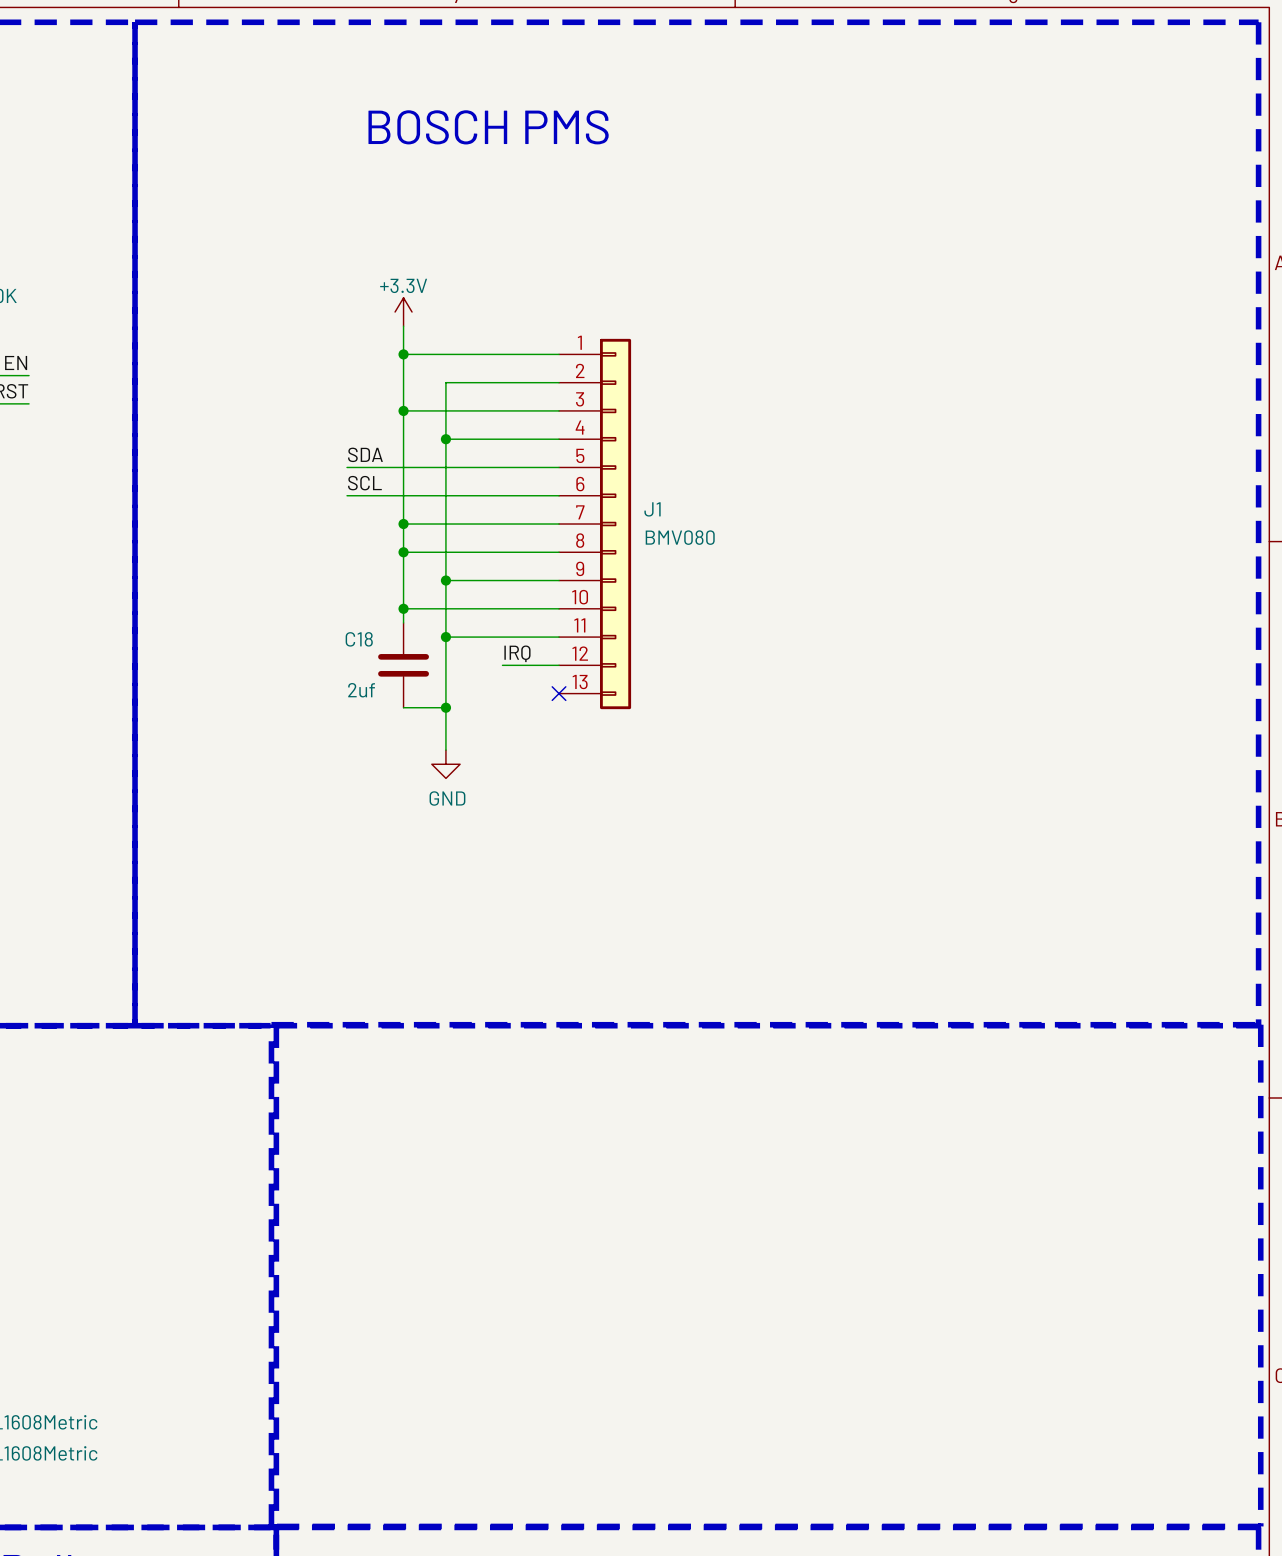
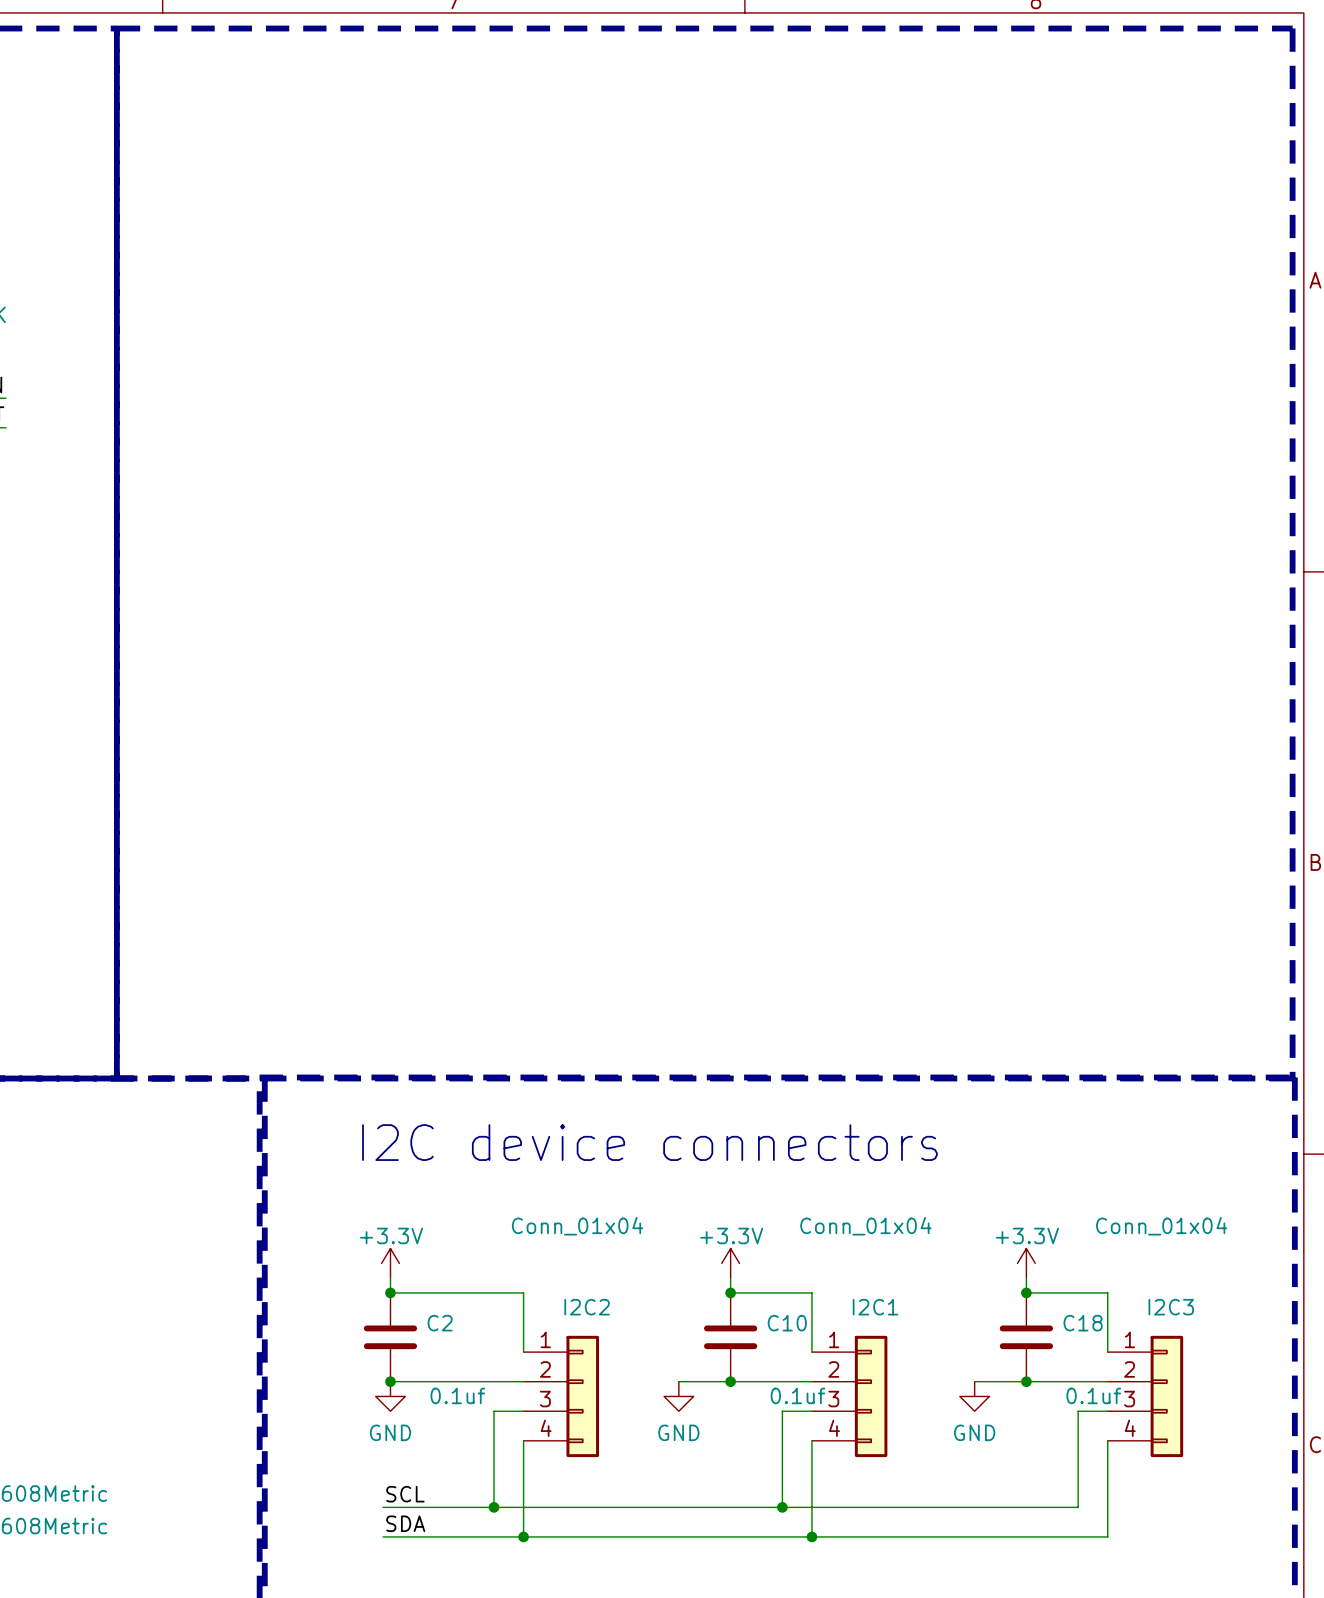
text: BOSCH PMS (488, 127) -> none
power symbol: +3.3V (403, 312) -> none
wire: (403, 326) (403, 622) -> none
wire: (403, 354) (559, 354) -> none
junction: (403, 354) -> none
wire: (559, 382) (445, 382) (445, 750) -> none
wire: (403, 410) (559, 410) -> none
junction: (403, 410) -> none
wire: (445, 439) (559, 439) -> none
junction: (445, 439) -> none
label: SDA (365, 454) -> none
wire: (347, 467) (559, 467) -> none
label: SCL (364, 483) -> none
wire: (347, 495) (559, 495) -> none
wire: (403, 524) (559, 524) -> none
junction: (403, 524) -> none
J1: BMV080 (595, 524) -> none
wire: (403, 552) (559, 552) -> none
junction: (403, 552) -> none
wire: (445, 580) (559, 580) -> none
junction: (445, 580) -> none
wire: (403, 608) (559, 608) -> none
junction: (403, 608) -> none
wire: (445, 637) (559, 637) -> none
junction: (445, 637) -> none
C18 name position: C18 (359, 639) -> C18 (1083, 1323)
label: IRQ (517, 653) -> none
C18 position: (403, 665) -> (1026, 1337)
wire: (502, 665) (559, 665) -> none
C18 value: 2uf (361, 690) -> 0.1uf (1093, 1395)
no-connect mark: (559, 693) -> none
wire: (403, 707) (445, 707) -> none
junction: (445, 707) -> none
power symbol: GND (445, 764) -> none
text: none -> I2C device connectors (649, 1142)
power symbol: none -> +3.3V (390, 1263)
power symbol: none -> +3.3V (730, 1263)
power symbol: none -> +3.3V (1026, 1263)
wire: none -> (390, 1278) (390, 1292) (523, 1292) (523, 1352)
wire: none -> (730, 1278) (730, 1292) (811, 1292) (811, 1352)
wire: none -> (1026, 1278) (1026, 1292) (1107, 1292) (1107, 1352)
junction: none -> (390, 1292)
junction: none -> (730, 1292)
junction: none -> (1026, 1292)
C2: none -> 0.1uf (390, 1337)
C10: none -> 0.1uf (730, 1337)
wire: none -> (390, 1381) (523, 1381)
junction: none -> (390, 1381)
wire: none -> (678, 1381) (811, 1381)
junction: none -> (730, 1381)
wire: none -> (974, 1381) (1107, 1381)
junction: none -> (1026, 1381)
power symbol: none -> GND (390, 1396)
I2C2: none -> Conn_01x04 (561, 1396)
power symbol: none -> GND (678, 1396)
I2C1: none -> Conn_01x04 (849, 1396)
power symbol: none -> GND (974, 1396)
I2C3: none -> Conn_01x04 (1145, 1396)
wire: none -> (523, 1411) (494, 1411) (494, 1507)
wire: none -> (811, 1411) (782, 1411) (782, 1507)
wire: none -> (1107, 1411) (1078, 1411) (1078, 1507) (383, 1507)
wire: none -> (523, 1440) (523, 1536)
wire: none -> (811, 1440) (811, 1536)
wire: none -> (1107, 1440) (1107, 1536) (383, 1536)
label: none -> SCL (405, 1494)
junction: none -> (494, 1507)
junction: none -> (782, 1507)
label: none -> SDA (405, 1523)
junction: none -> (523, 1536)
junction: none -> (811, 1536)

